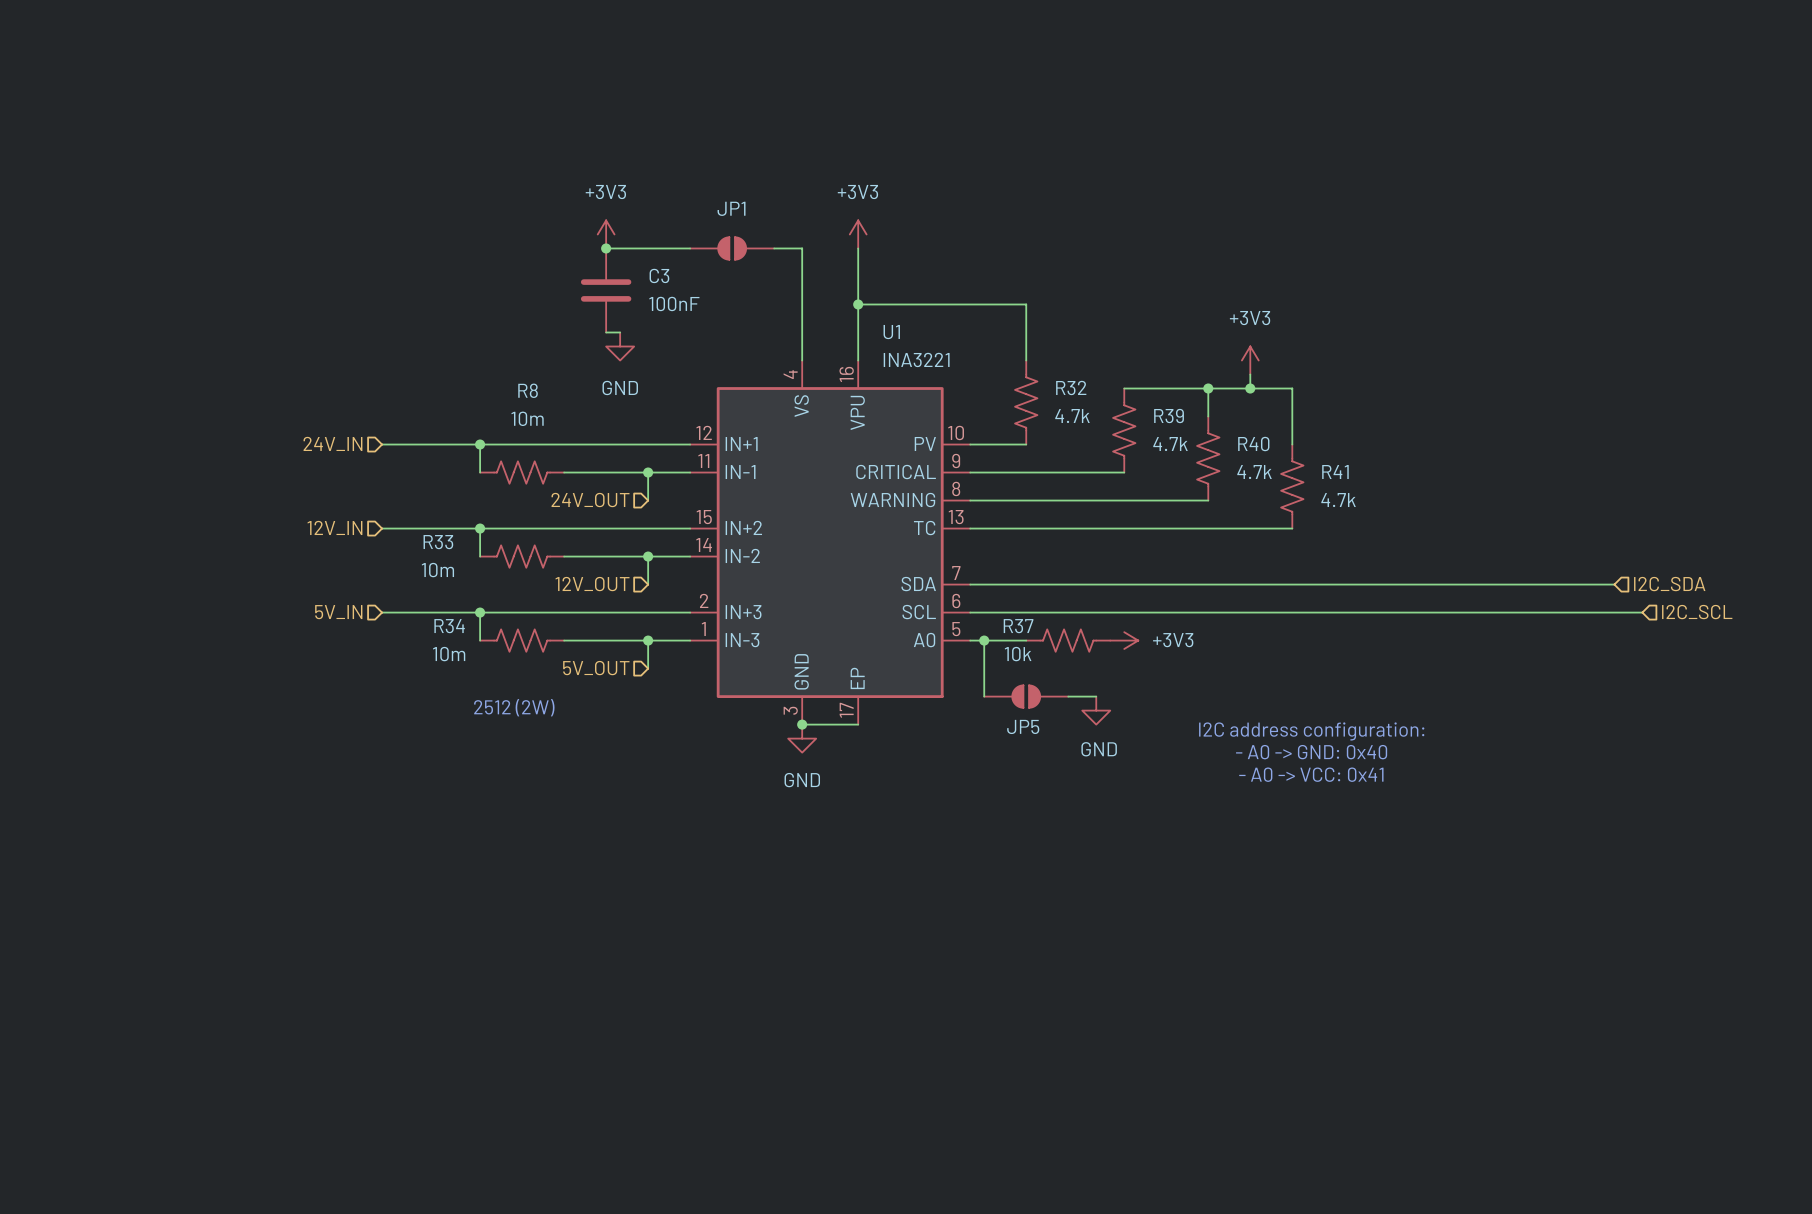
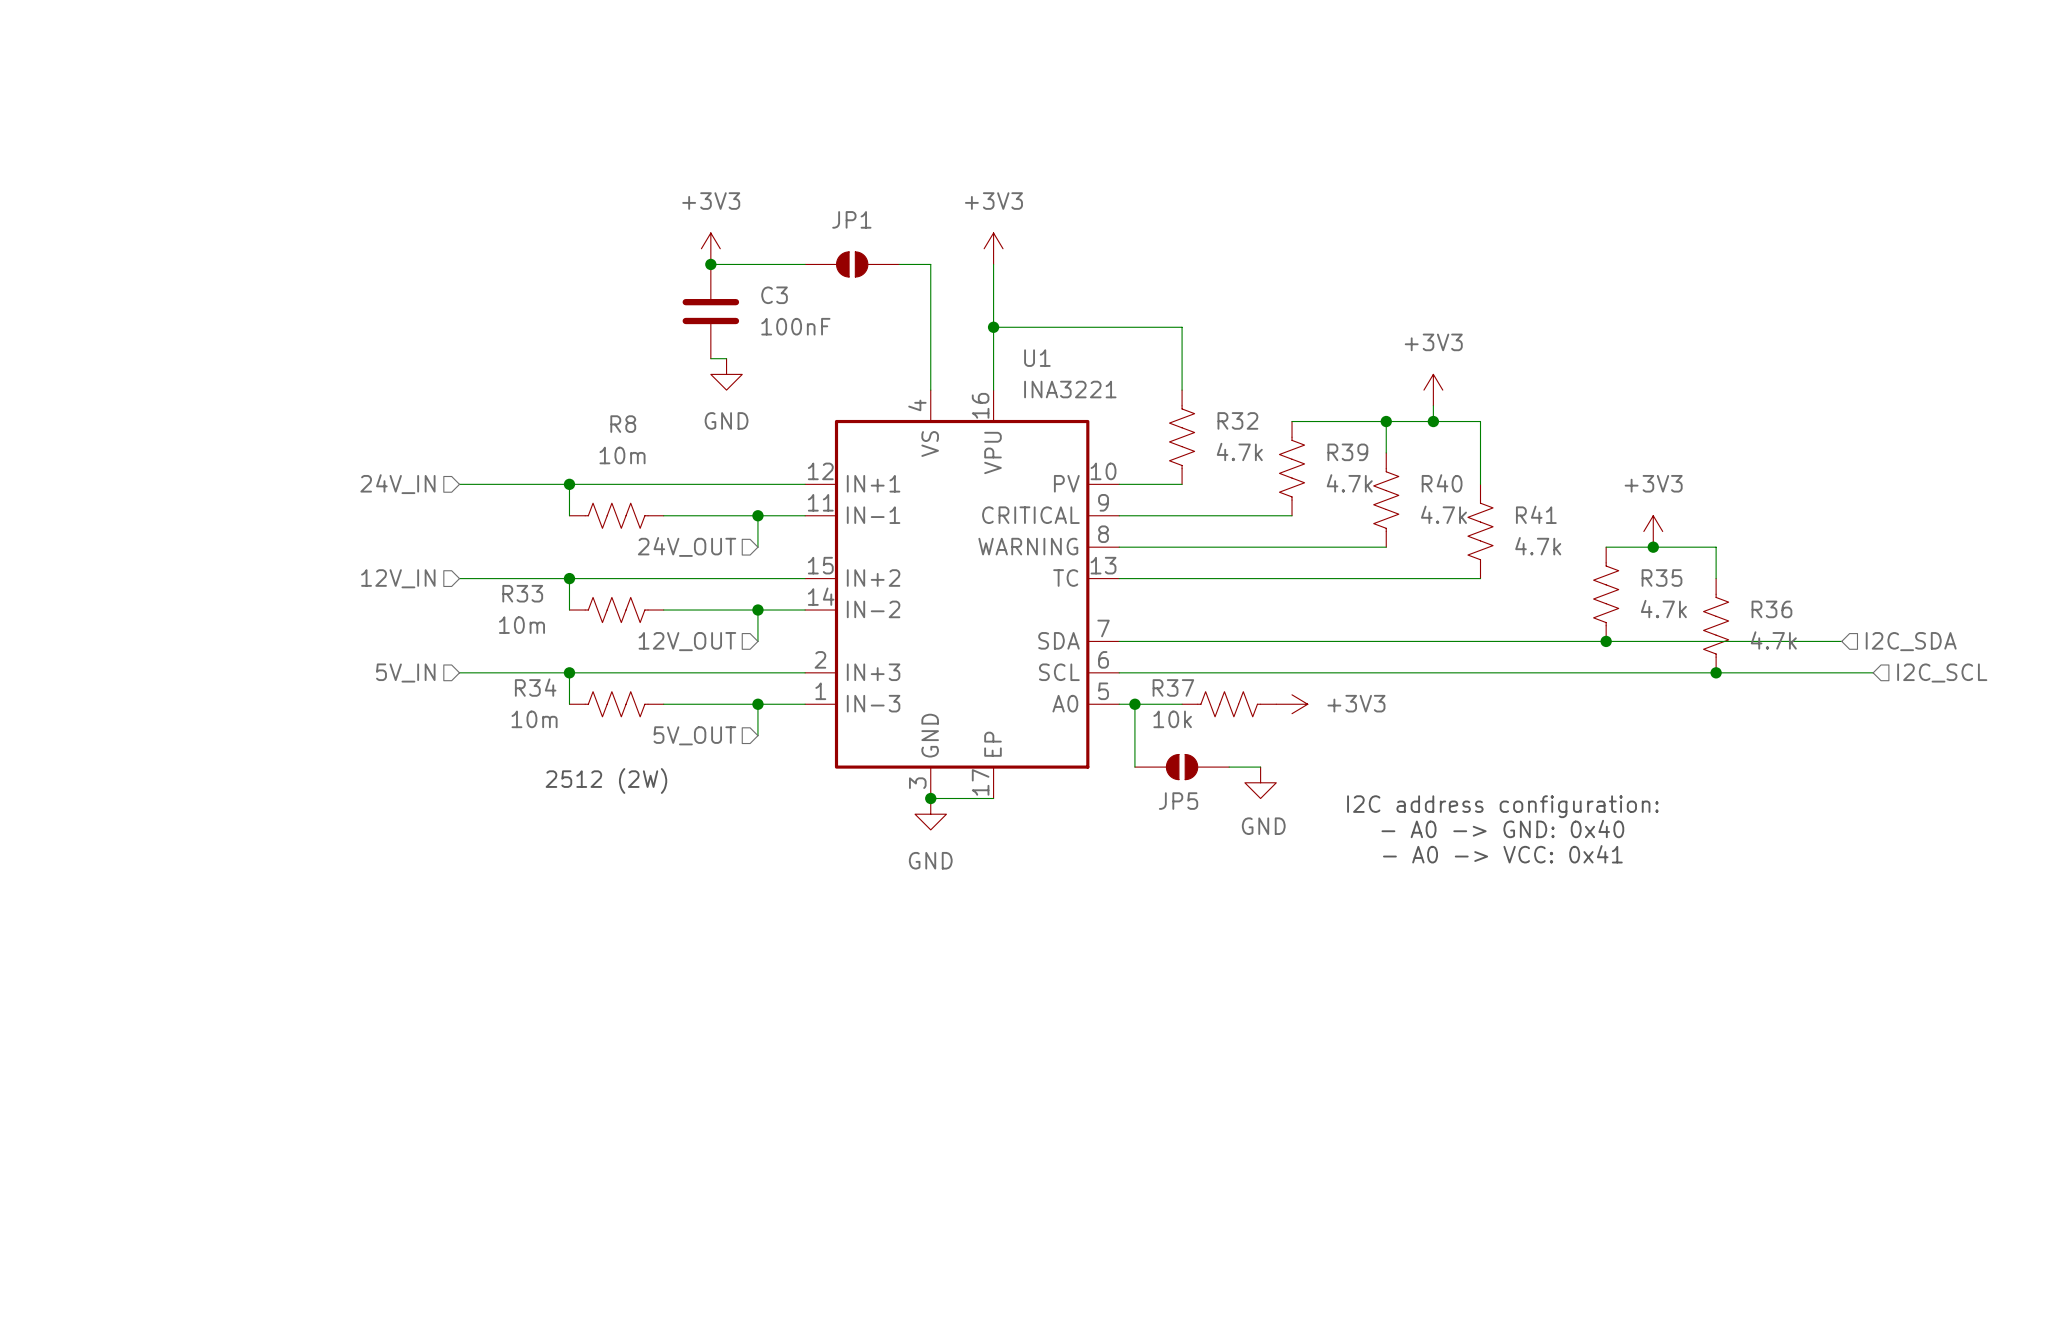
power symbol: none -> +3V3 (1653, 531)
wire: none -> (1606, 547) (1716, 547) (1716, 578)
junction: none -> (1653, 547)
R35: none -> 4.7k (1606, 594)
R36: none -> 4.7k (1716, 625)
junction: none -> (1606, 641)
junction: none -> (1716, 672)

